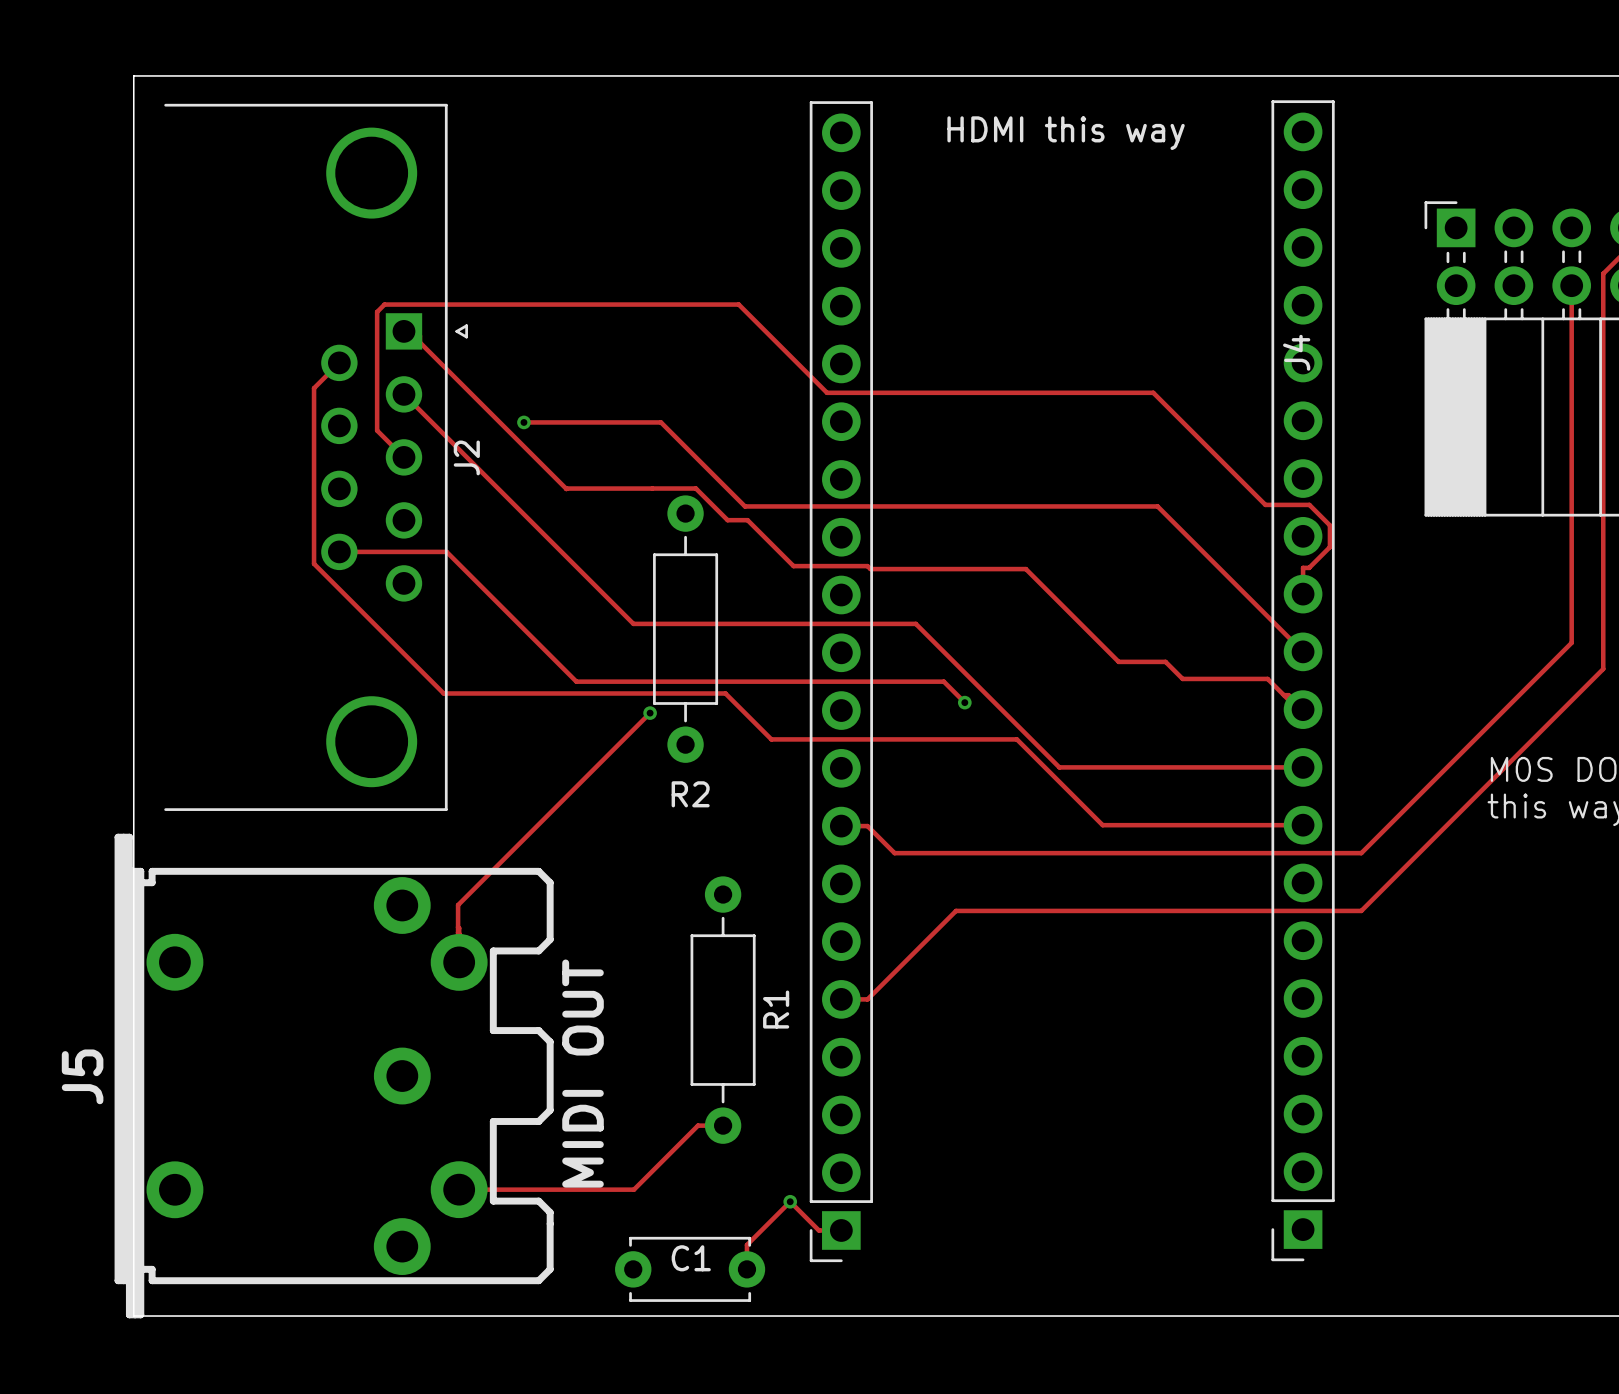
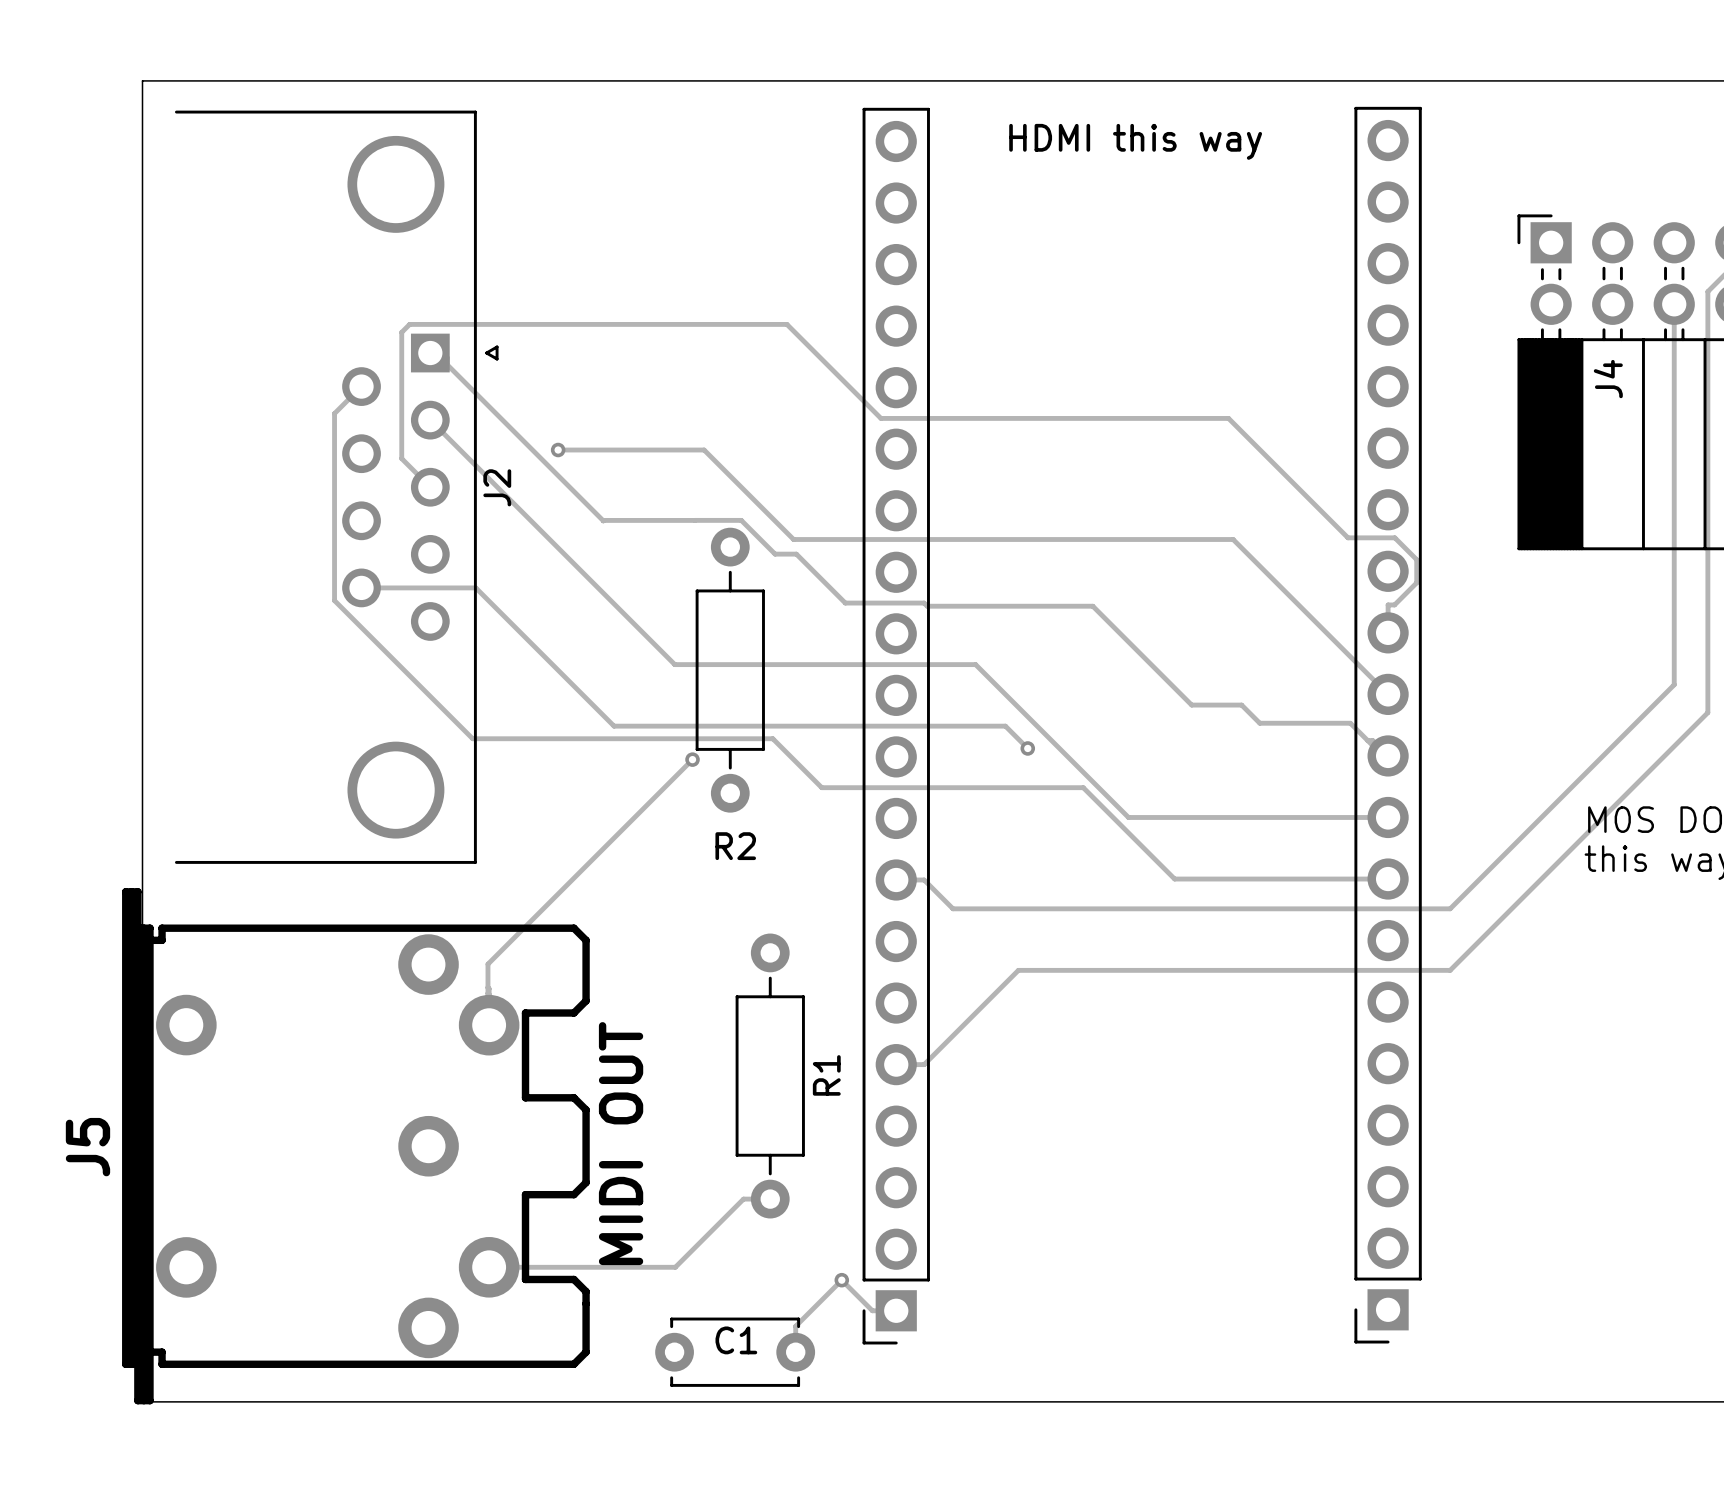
J4 name position: J4 (1296, 352) -> J4 (1608, 379)

